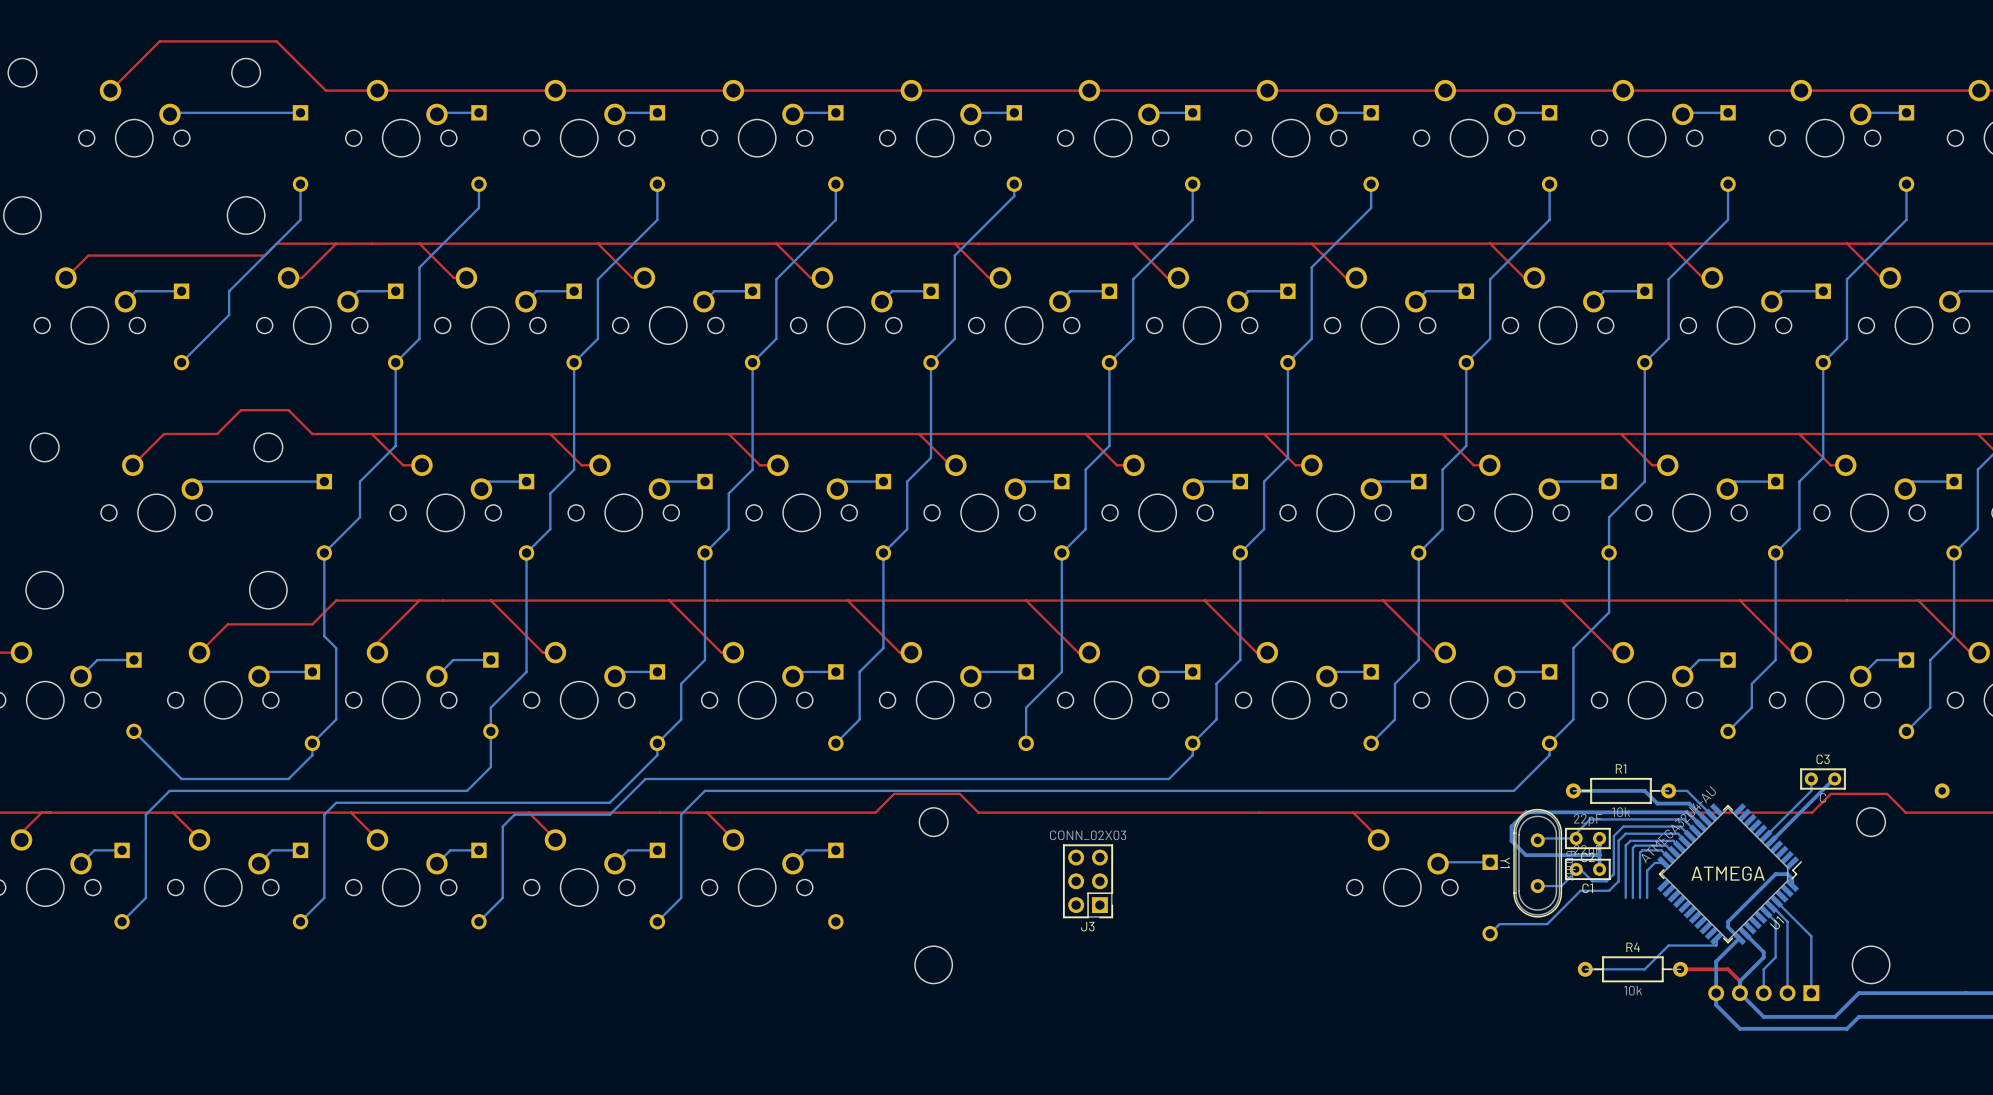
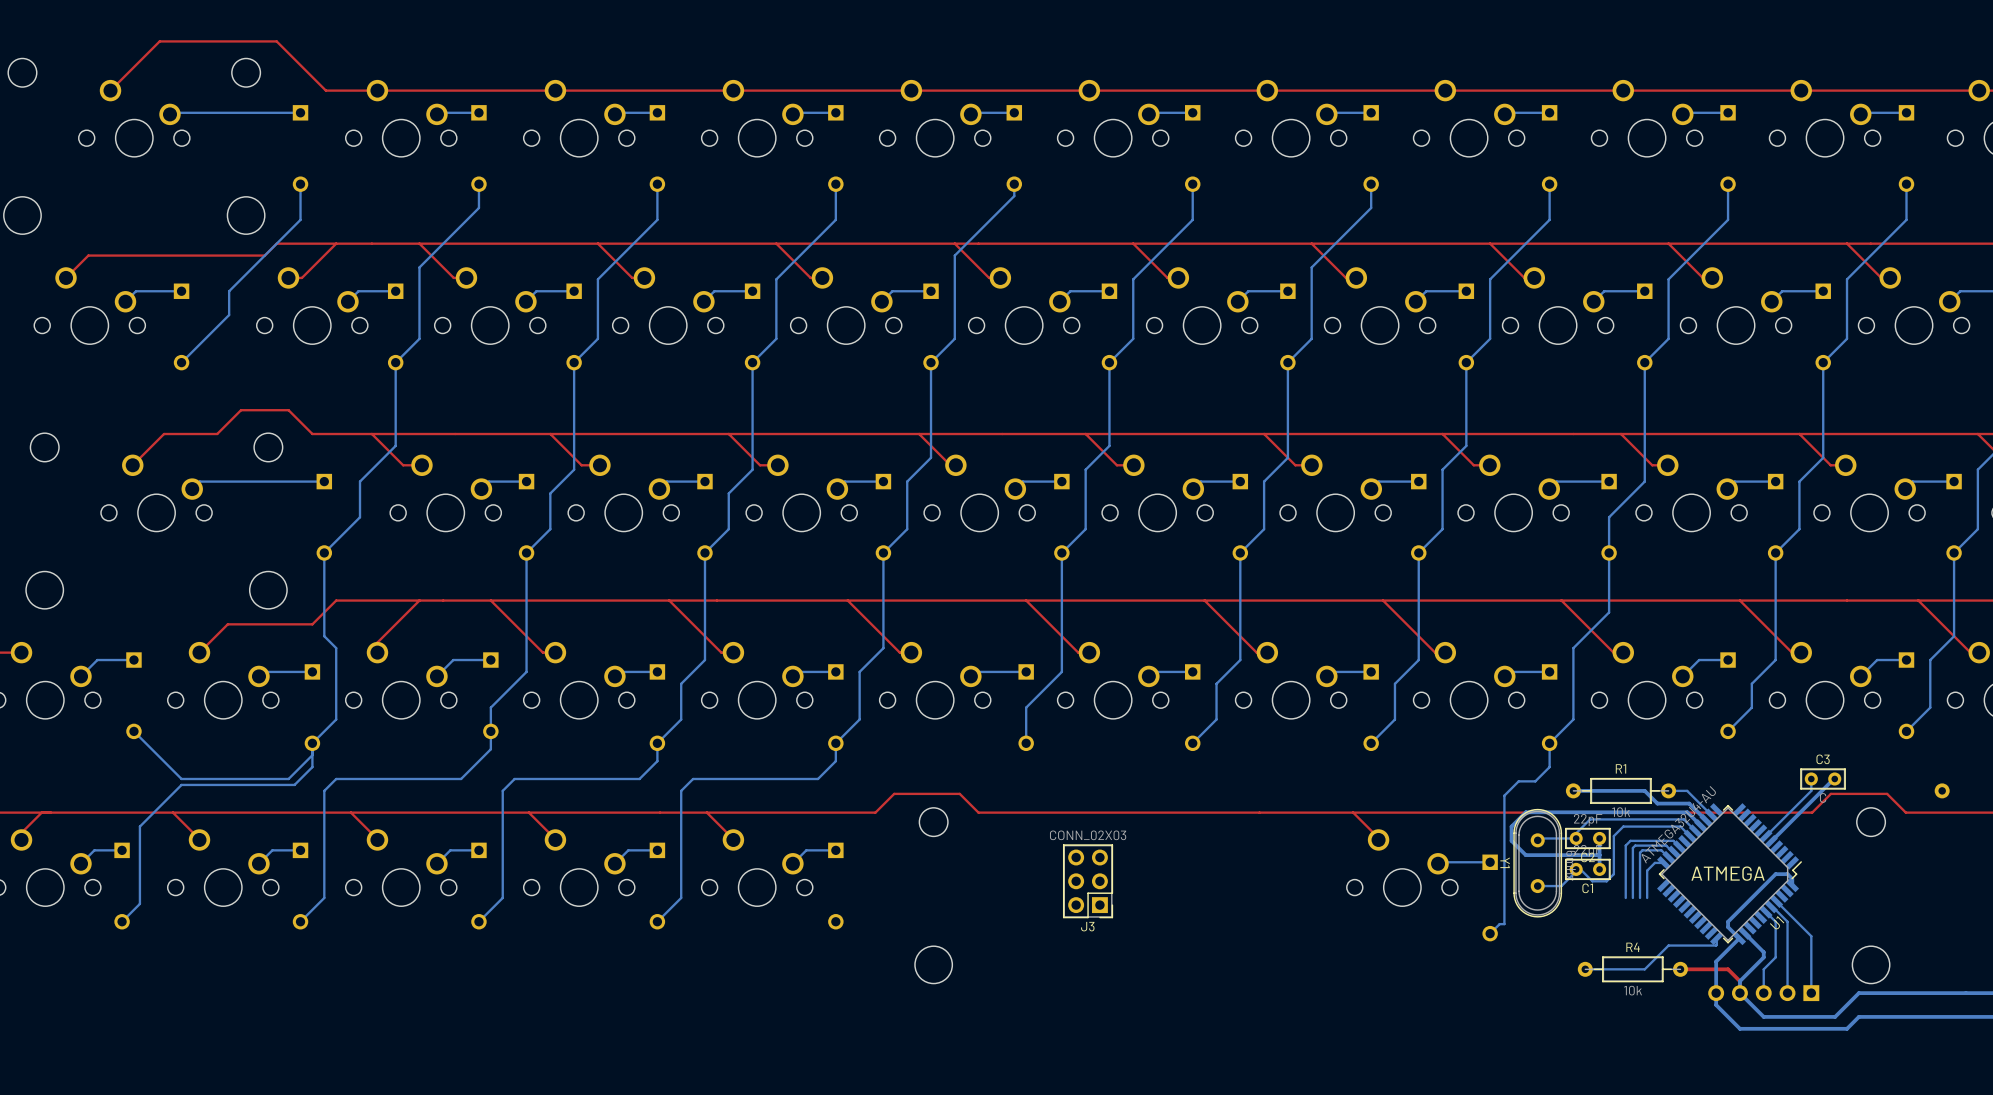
bottom track: (1192, 743) (1192, 755) (1168, 778) (818, 778) -> (835, 743) (835, 761) (818, 778)
bottom track: (490, 749) (490, 767) (467, 790) (169, 790) (145, 814) (145, 897) (139, 903) -> (312, 755) (312, 767) (294, 784) (181, 784) (139, 826) (139, 903)
bottom track: (657, 755) (609, 802) (336, 802) (324, 814) -> (490, 749) (461, 778) (336, 778) (324, 790) (324, 814)
bottom track: (1549, 755) (1513, 790) (704, 790) (681, 814) -> (693, 778) (681, 790) (681, 814)
bottom track: (693, 778) (645, 778) (609, 814) (514, 814) (502, 826) -> (657, 755) (657, 761) (639, 778) (514, 778) (502, 790) (502, 826)
bottom track: (1685, 840) (1678, 833) (1625, 833) (1618, 840) (1618, 881) (1609, 890) (1580, 890) (1547, 924) (1504, 924) -> (1549, 755) (1549, 767) (1535, 781) (1518, 781) (1504, 795) (1504, 924)

